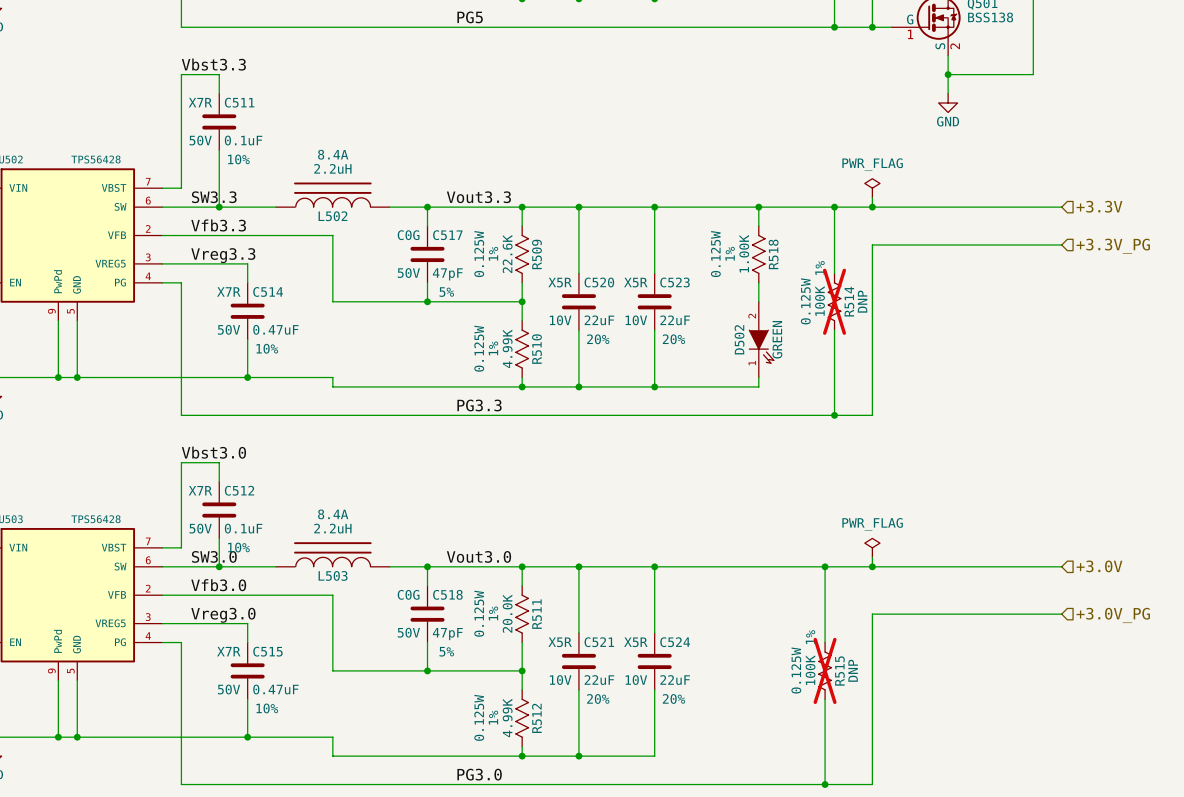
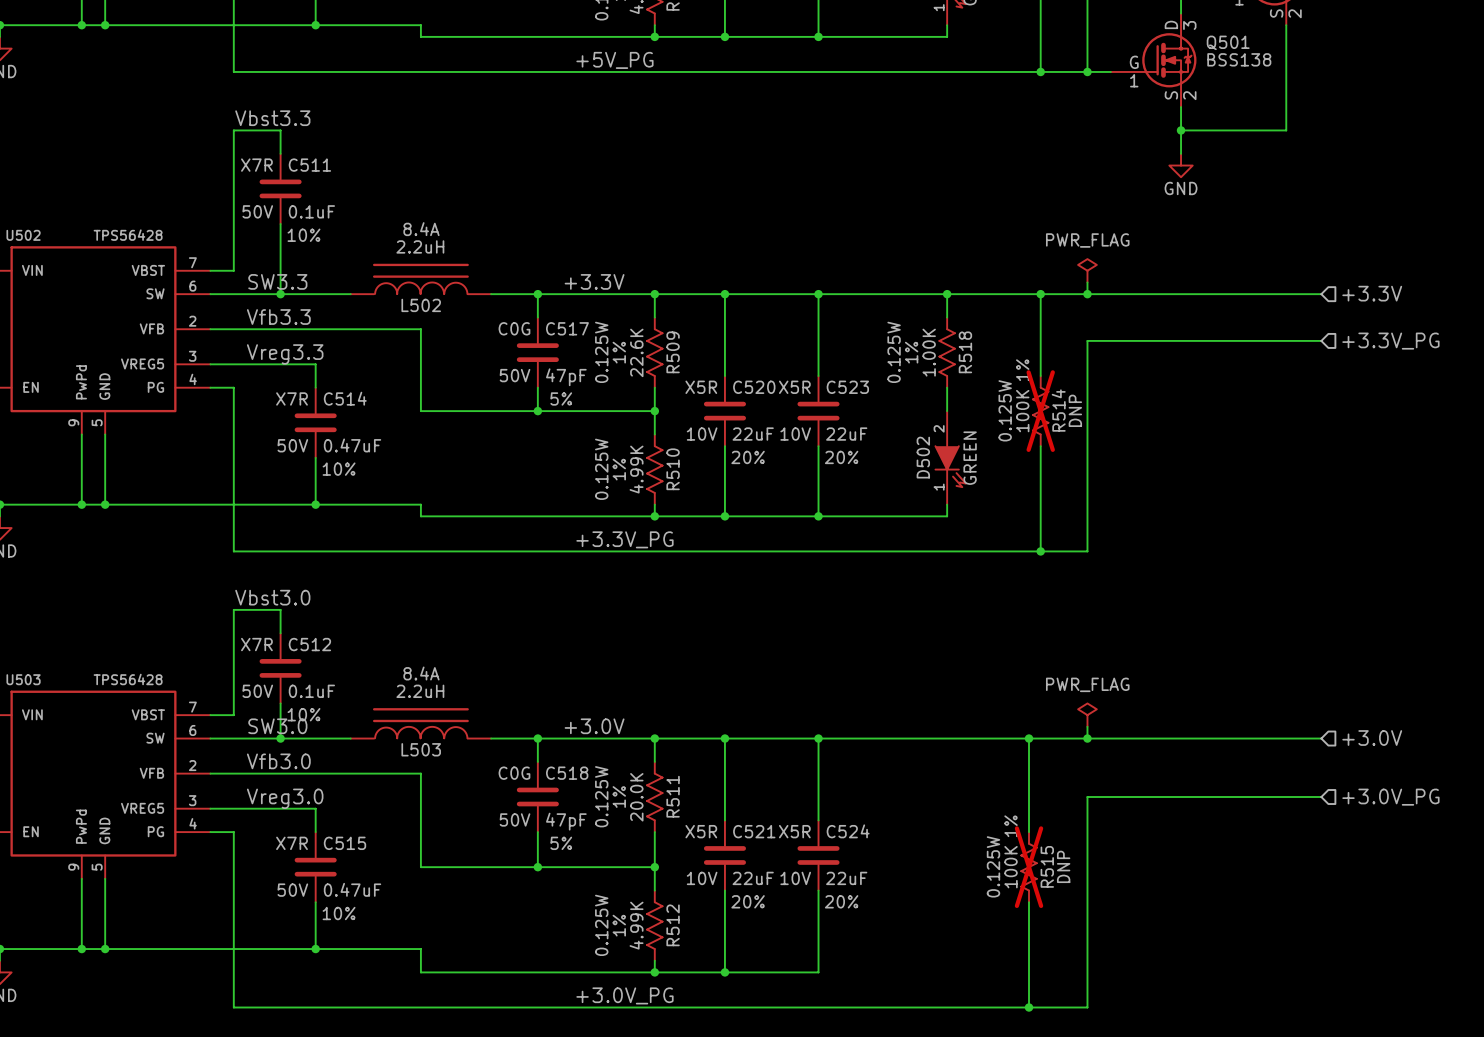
label: PG5 (470, 17) -> +5V_PG (614, 60)
label: Vout3.3 (478, 197) -> +3.3V (594, 281)
label: PG3.3 (479, 405) -> +3.3V_PG (624, 539)
label: Vout3.0 (478, 556) -> +3.0V (594, 726)
label: PG3.0 (479, 774) -> +3.0V_PG (624, 995)

